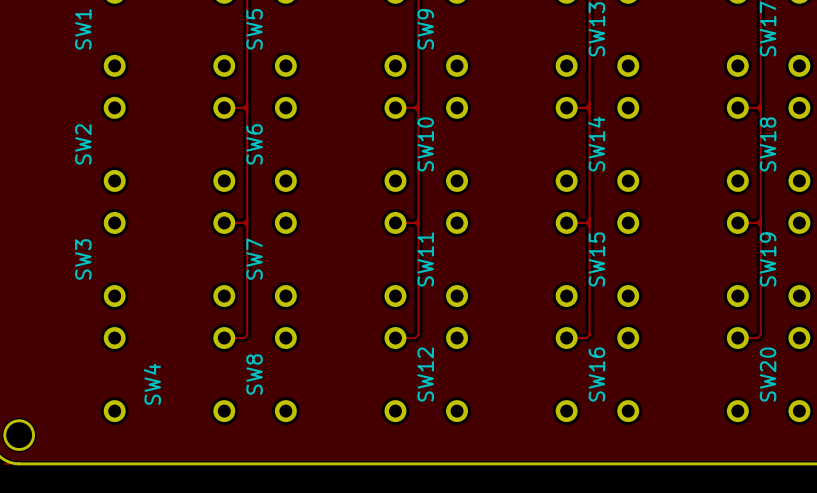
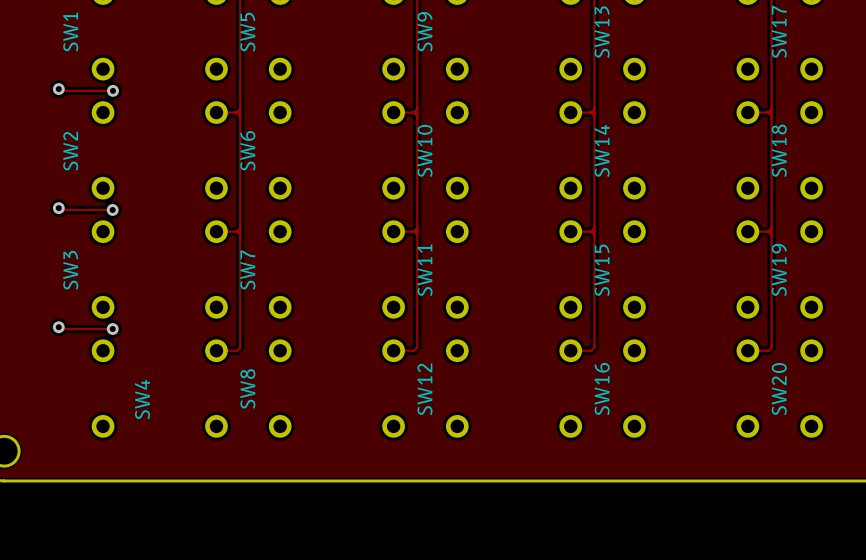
track: none -> (58, 89) (60, 90) (113, 90)
via: none -> (58, 89)
via: none -> (113, 90)
track: none -> (58, 208) (60, 209) (112, 209)
via: none -> (58, 208)
via: none -> (112, 209)
track: none -> (58, 327) (60, 329) (112, 329)
via: none -> (58, 327)
via: none -> (112, 329)

